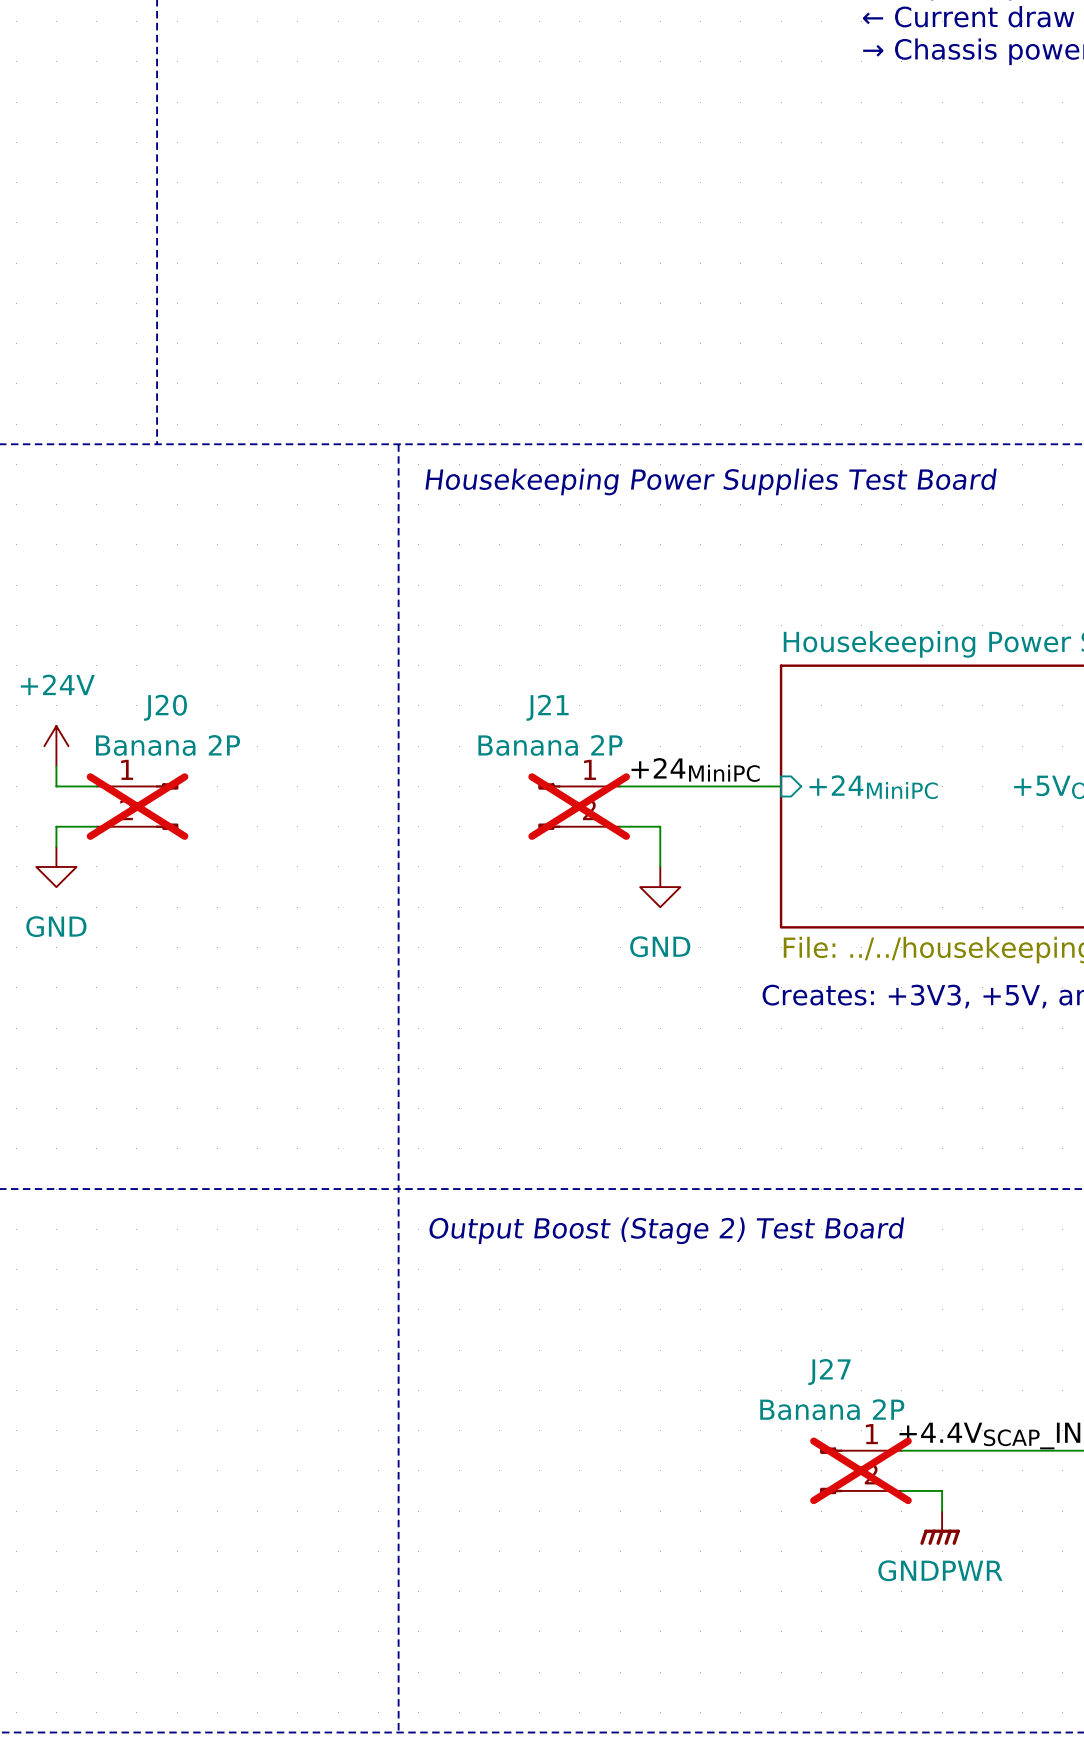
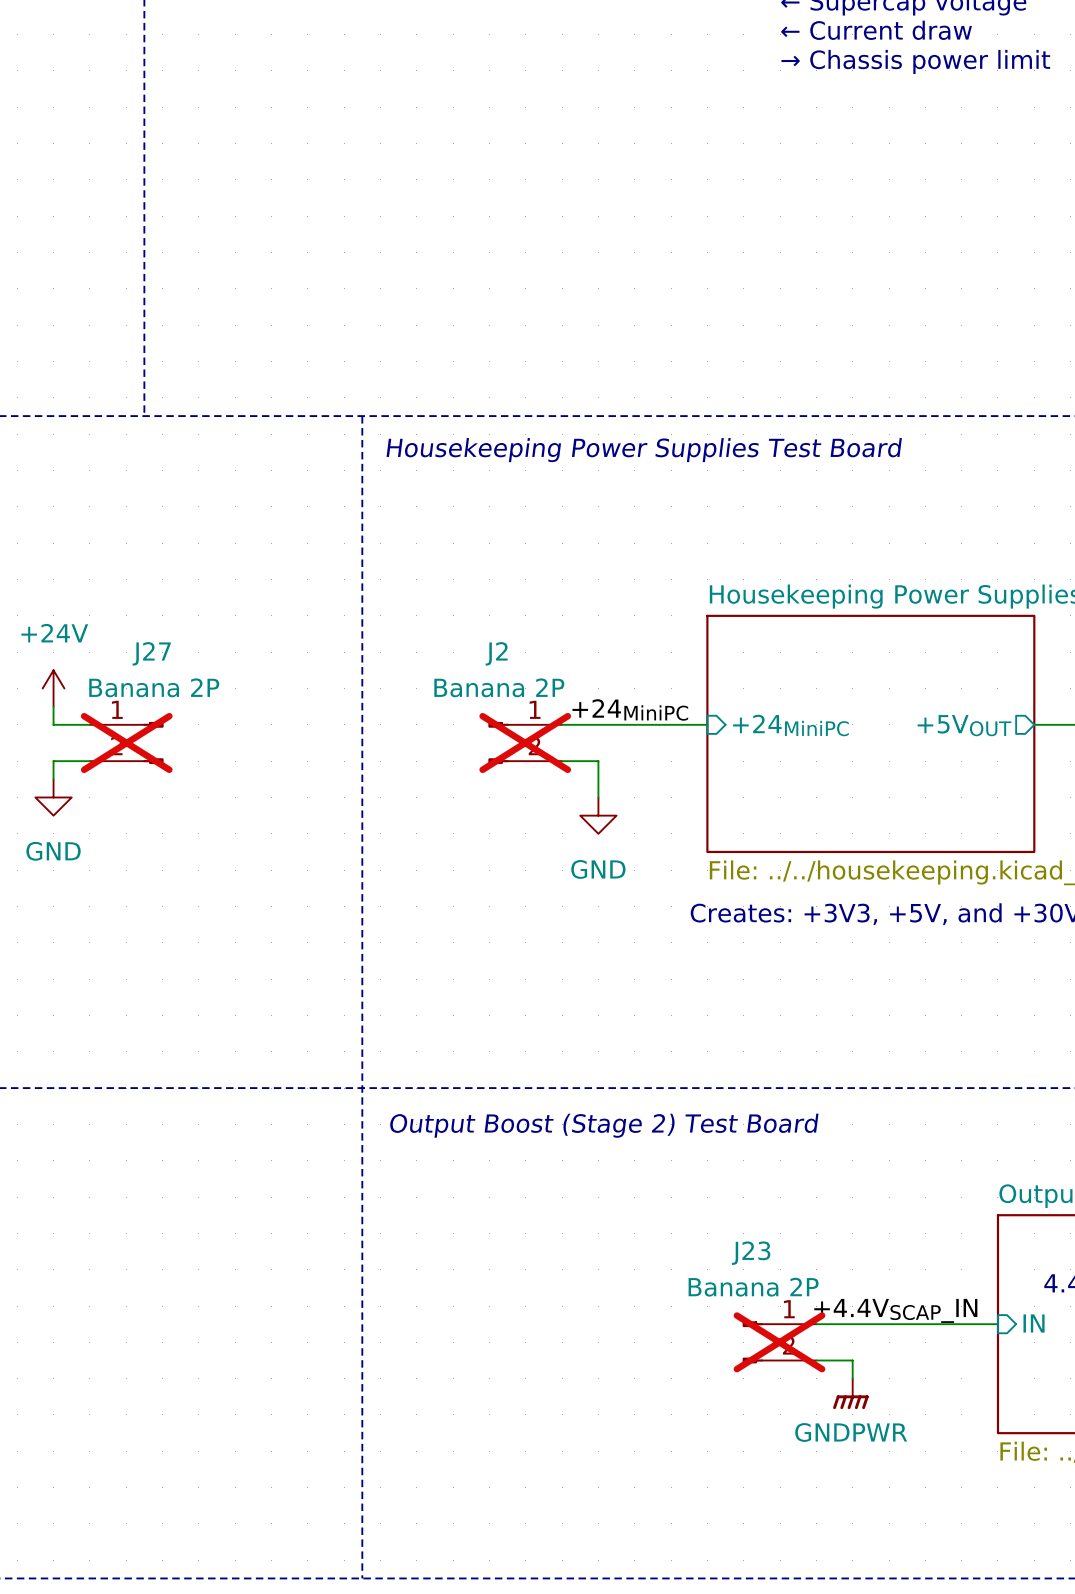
J20 name: J20 (165, 707) -> J27 (151, 653)
J21 name: J21 (547, 707) -> J2 (496, 653)
J27 name: J27 (829, 1372) -> J23 (751, 1253)

